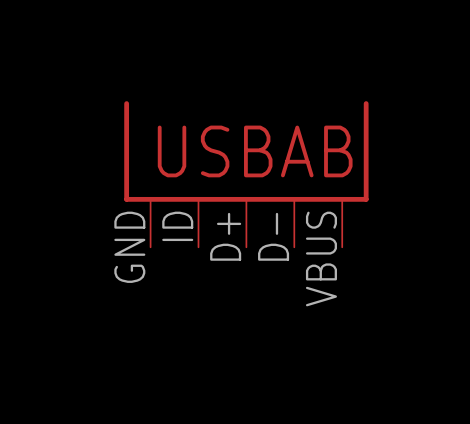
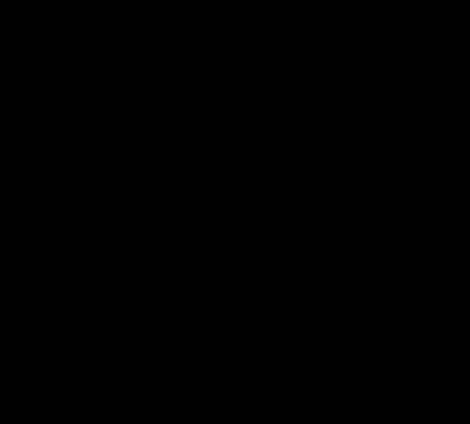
part: (246, 174) -> none

